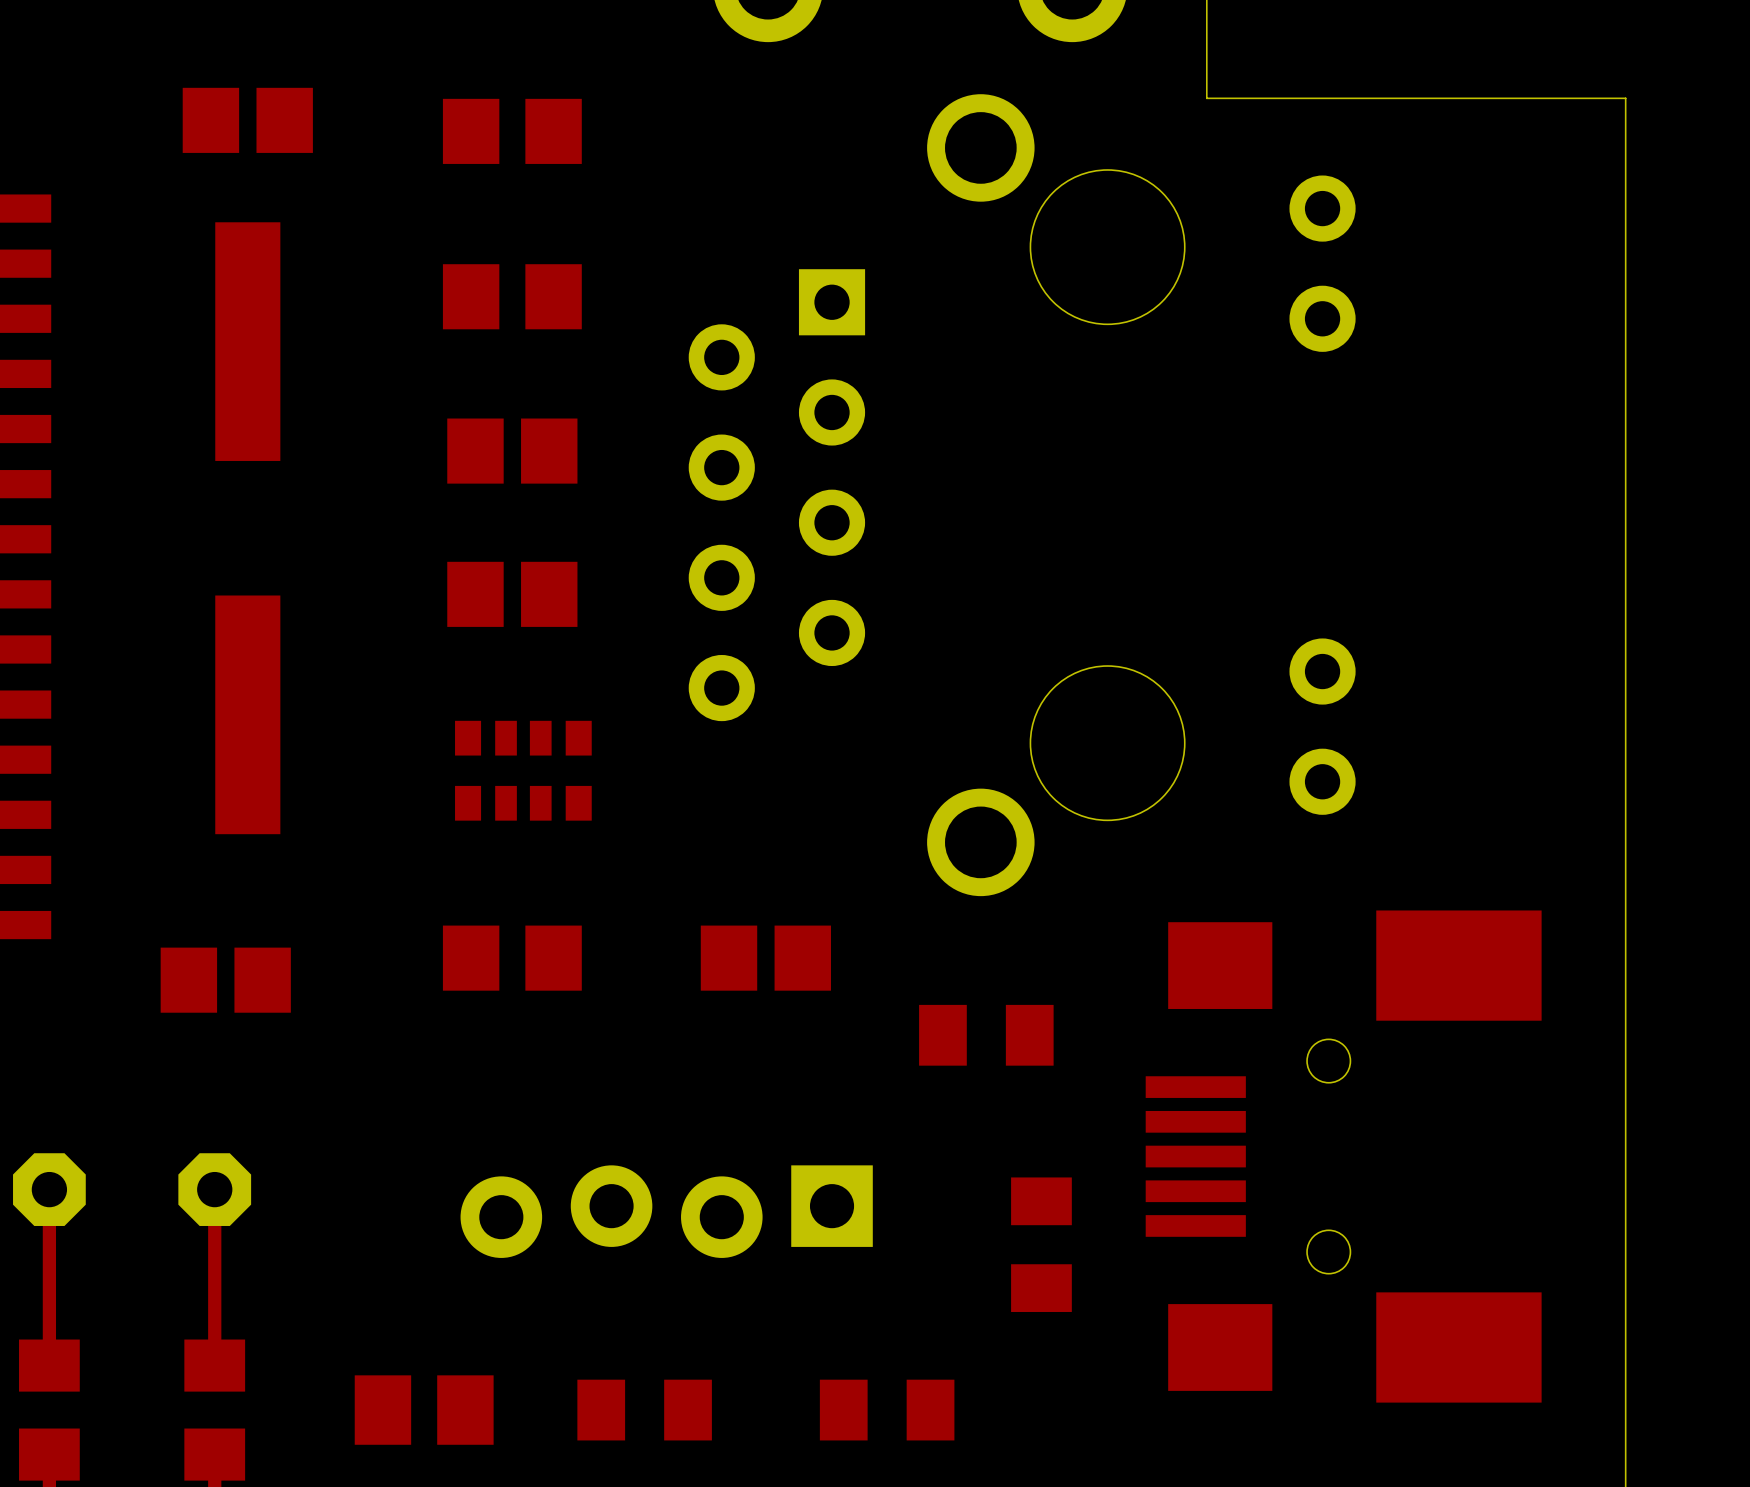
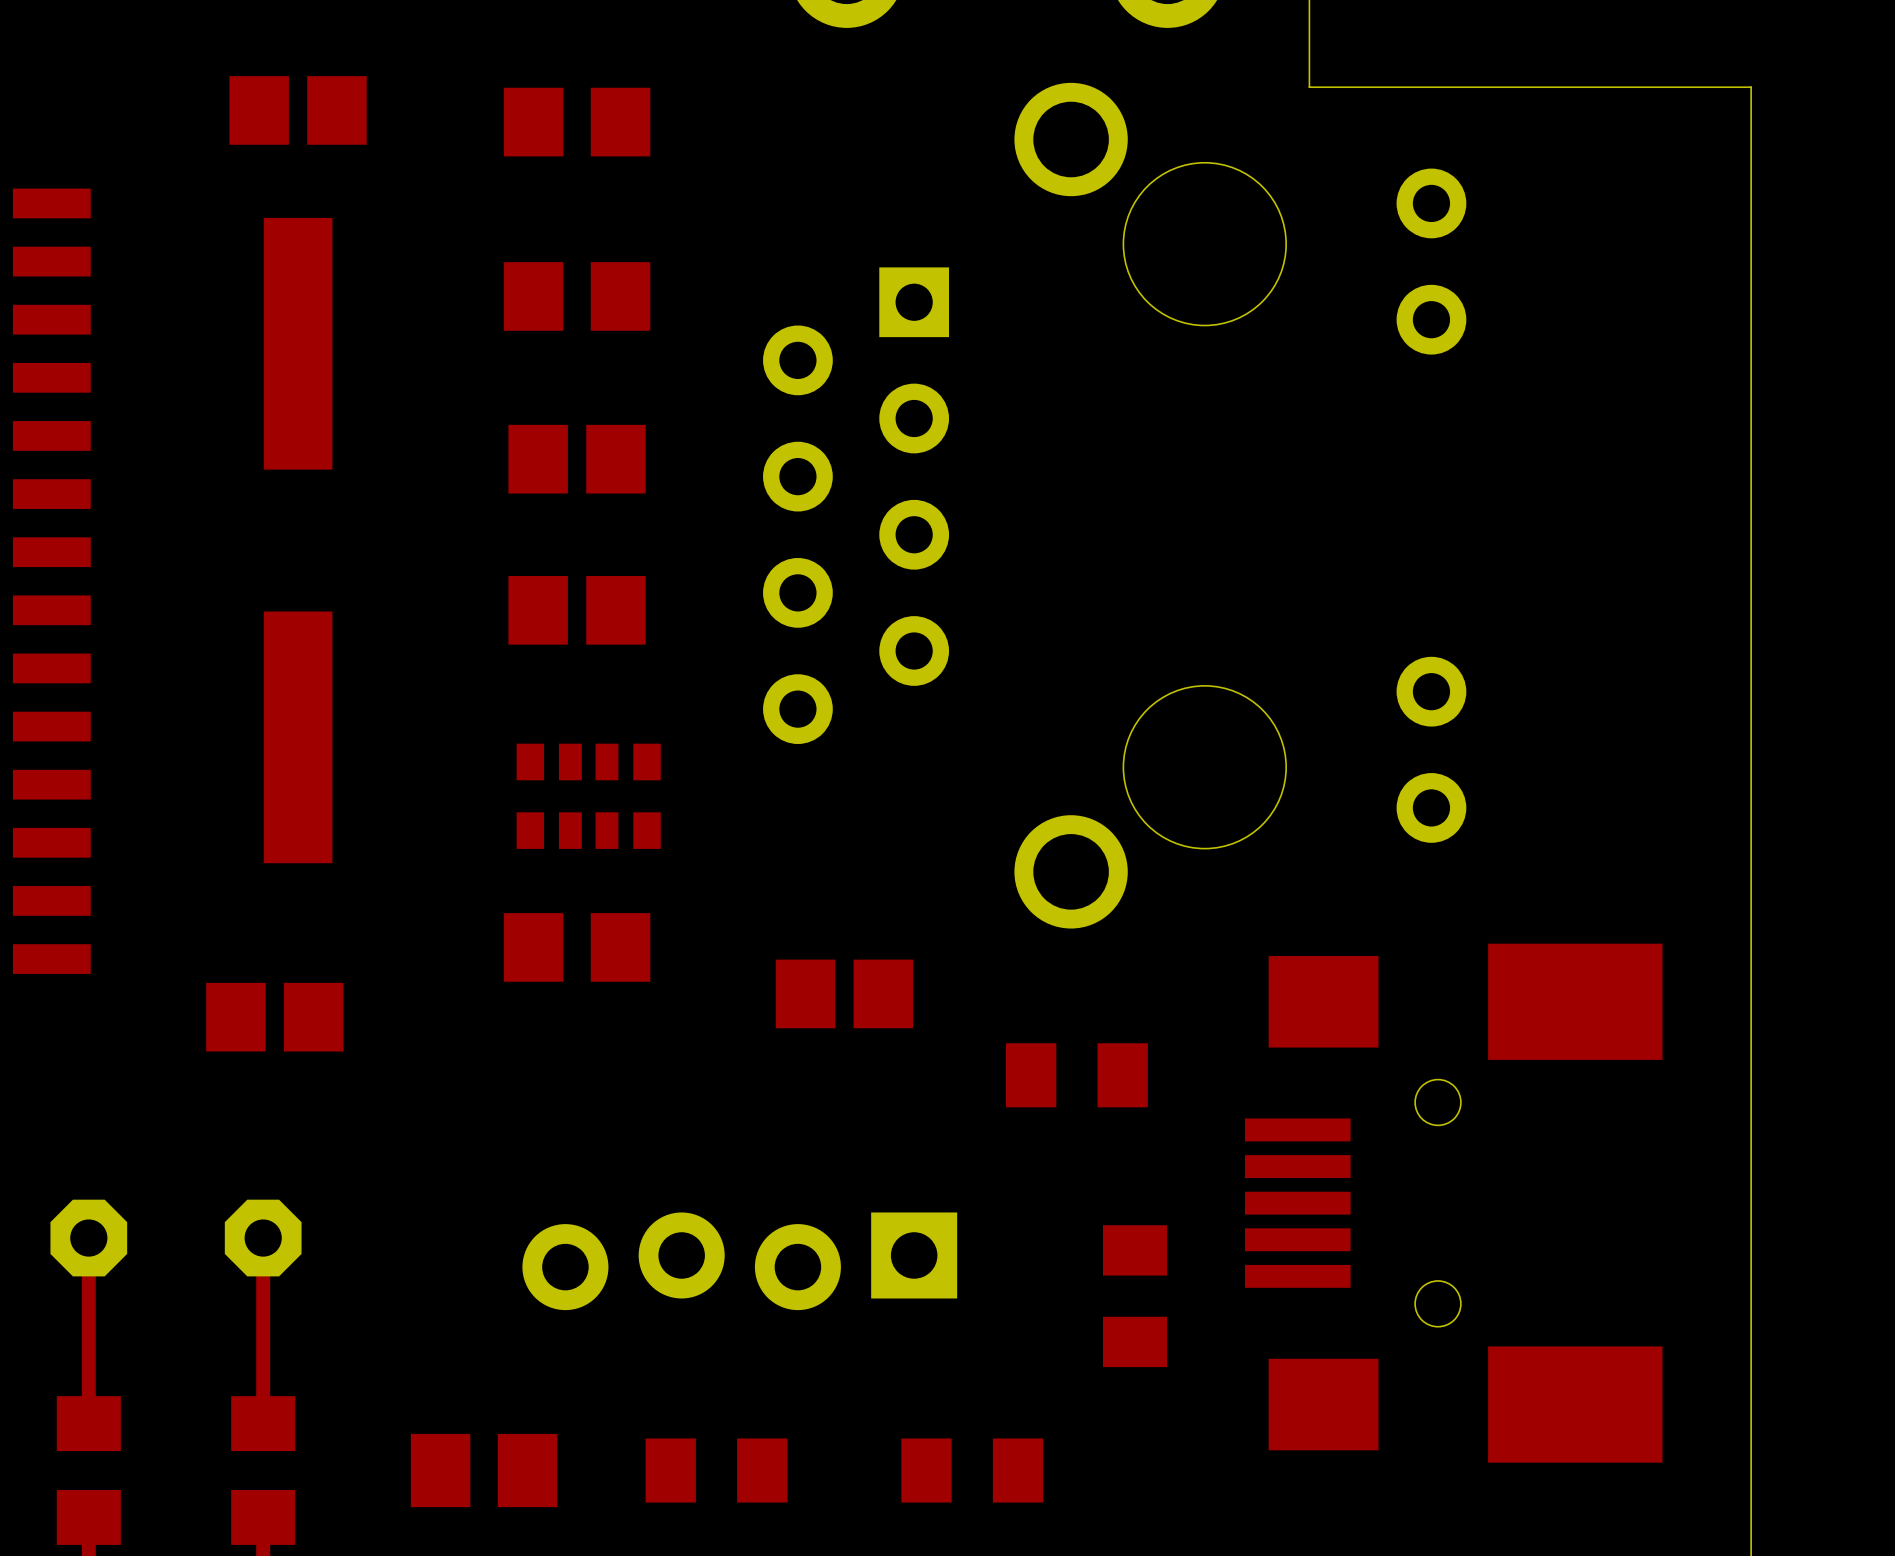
part position: (512, 958) -> (577, 947)

